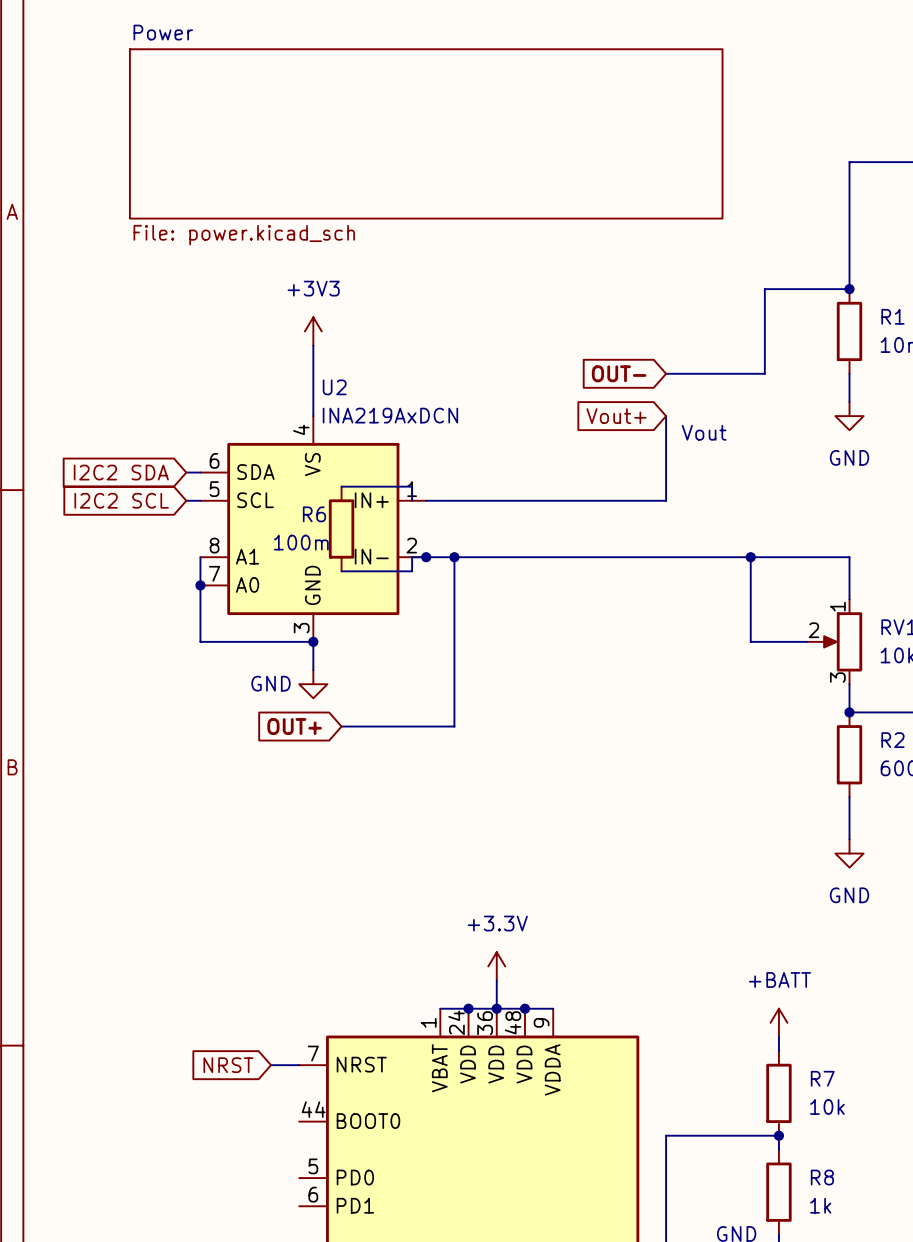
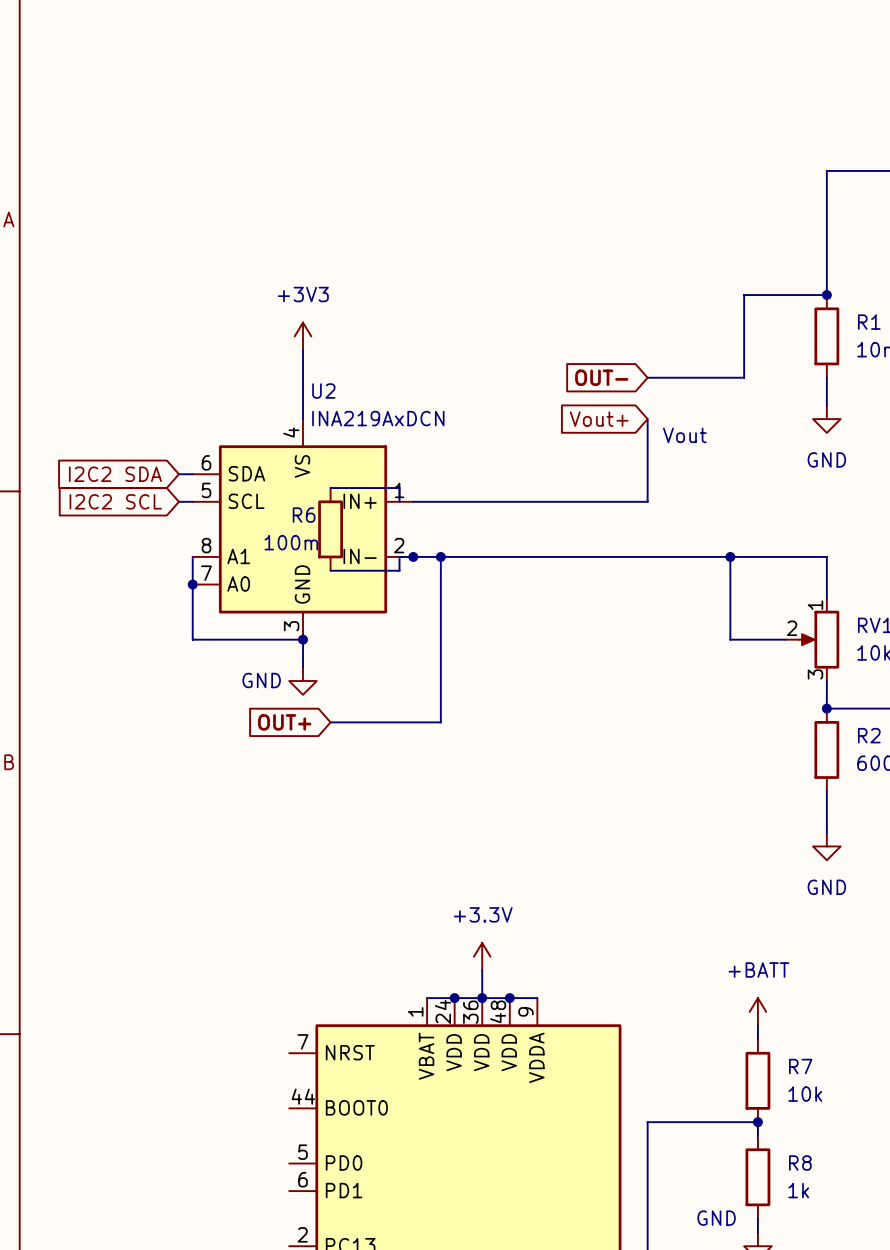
sheet Power: File: power.kicad_sch (426, 133) -> none
global label: NRST (228, 1065) -> none
wire: (271, 1065) (299, 1065) -> none

